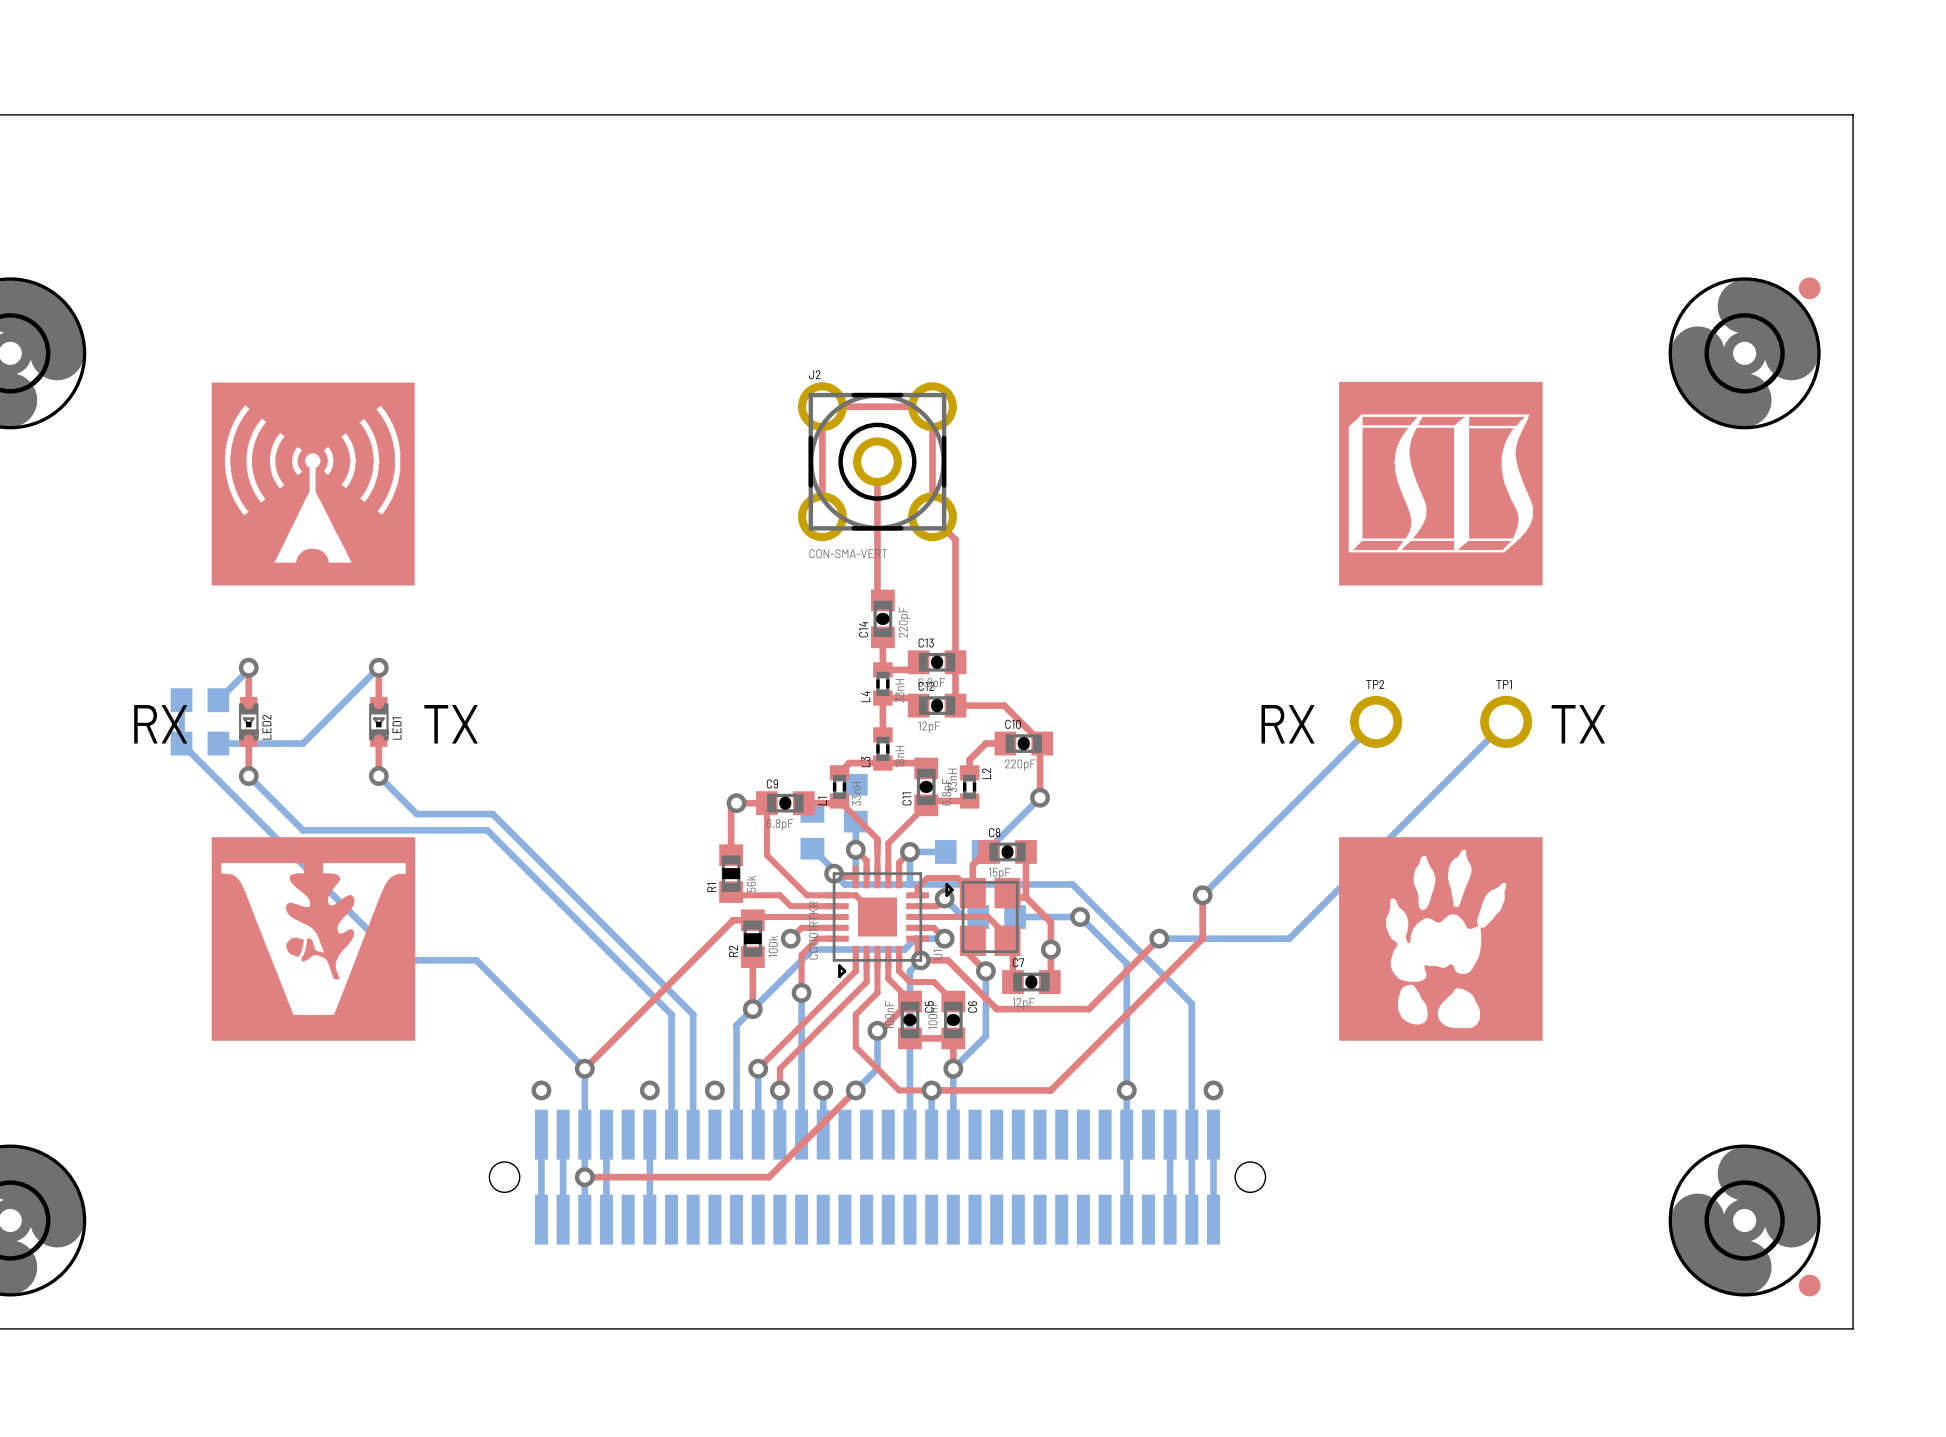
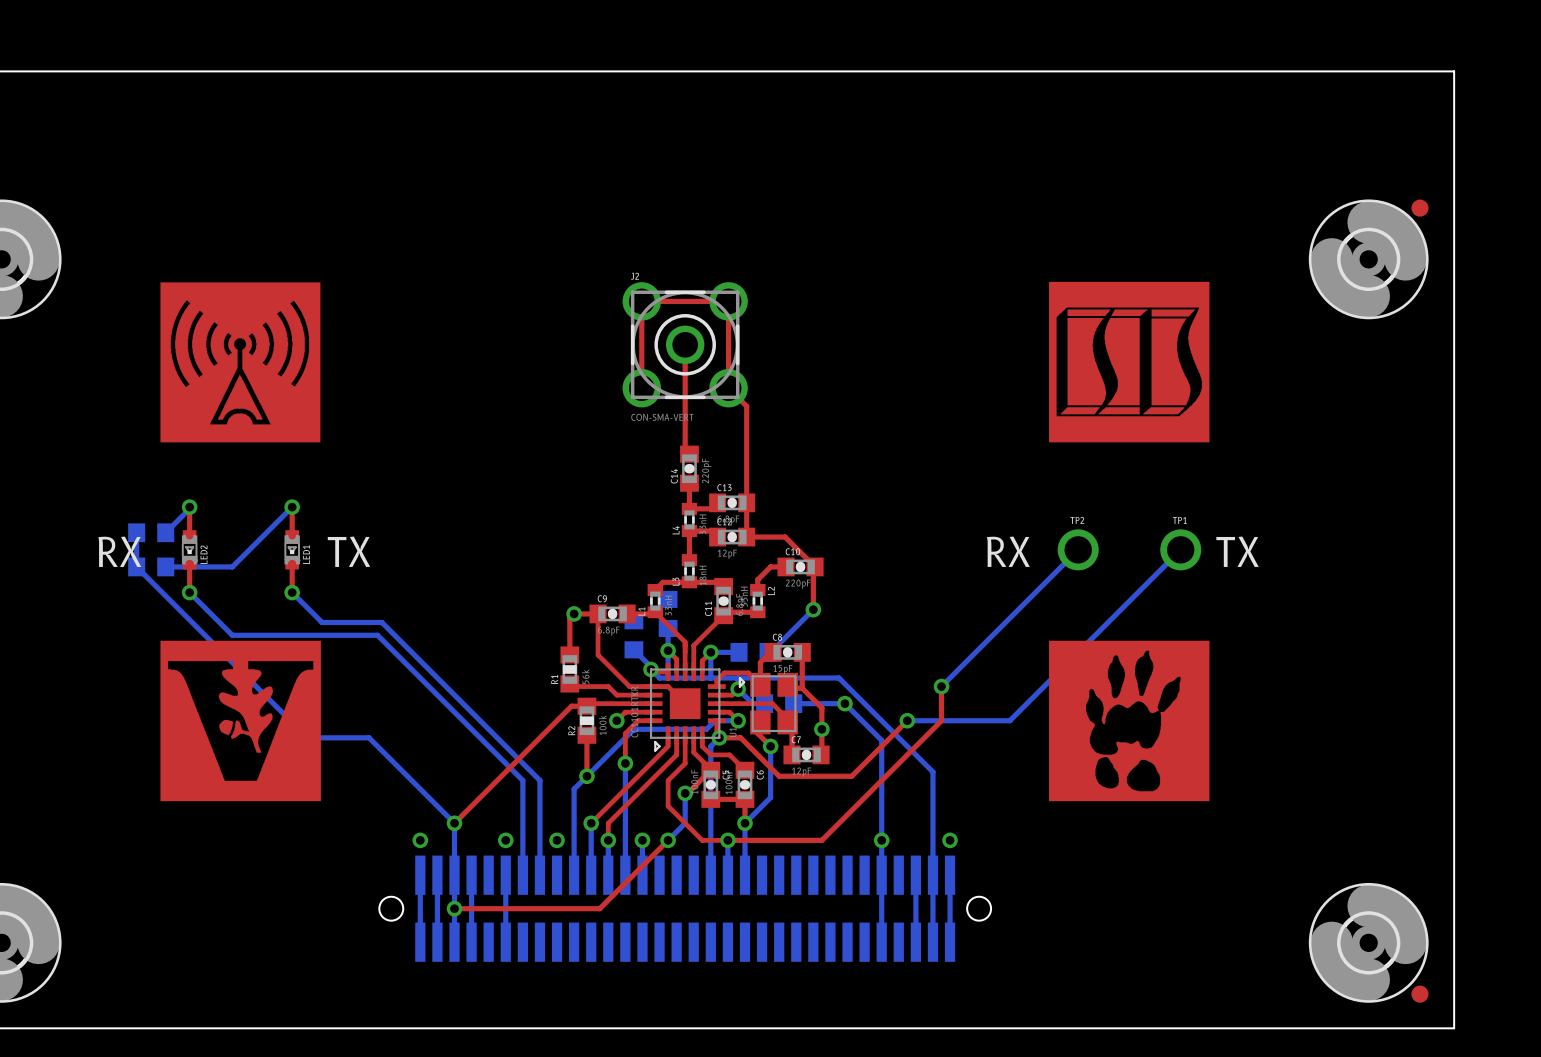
drawing shape: [211, 382, 415, 586] -> [160, 282, 321, 443]

